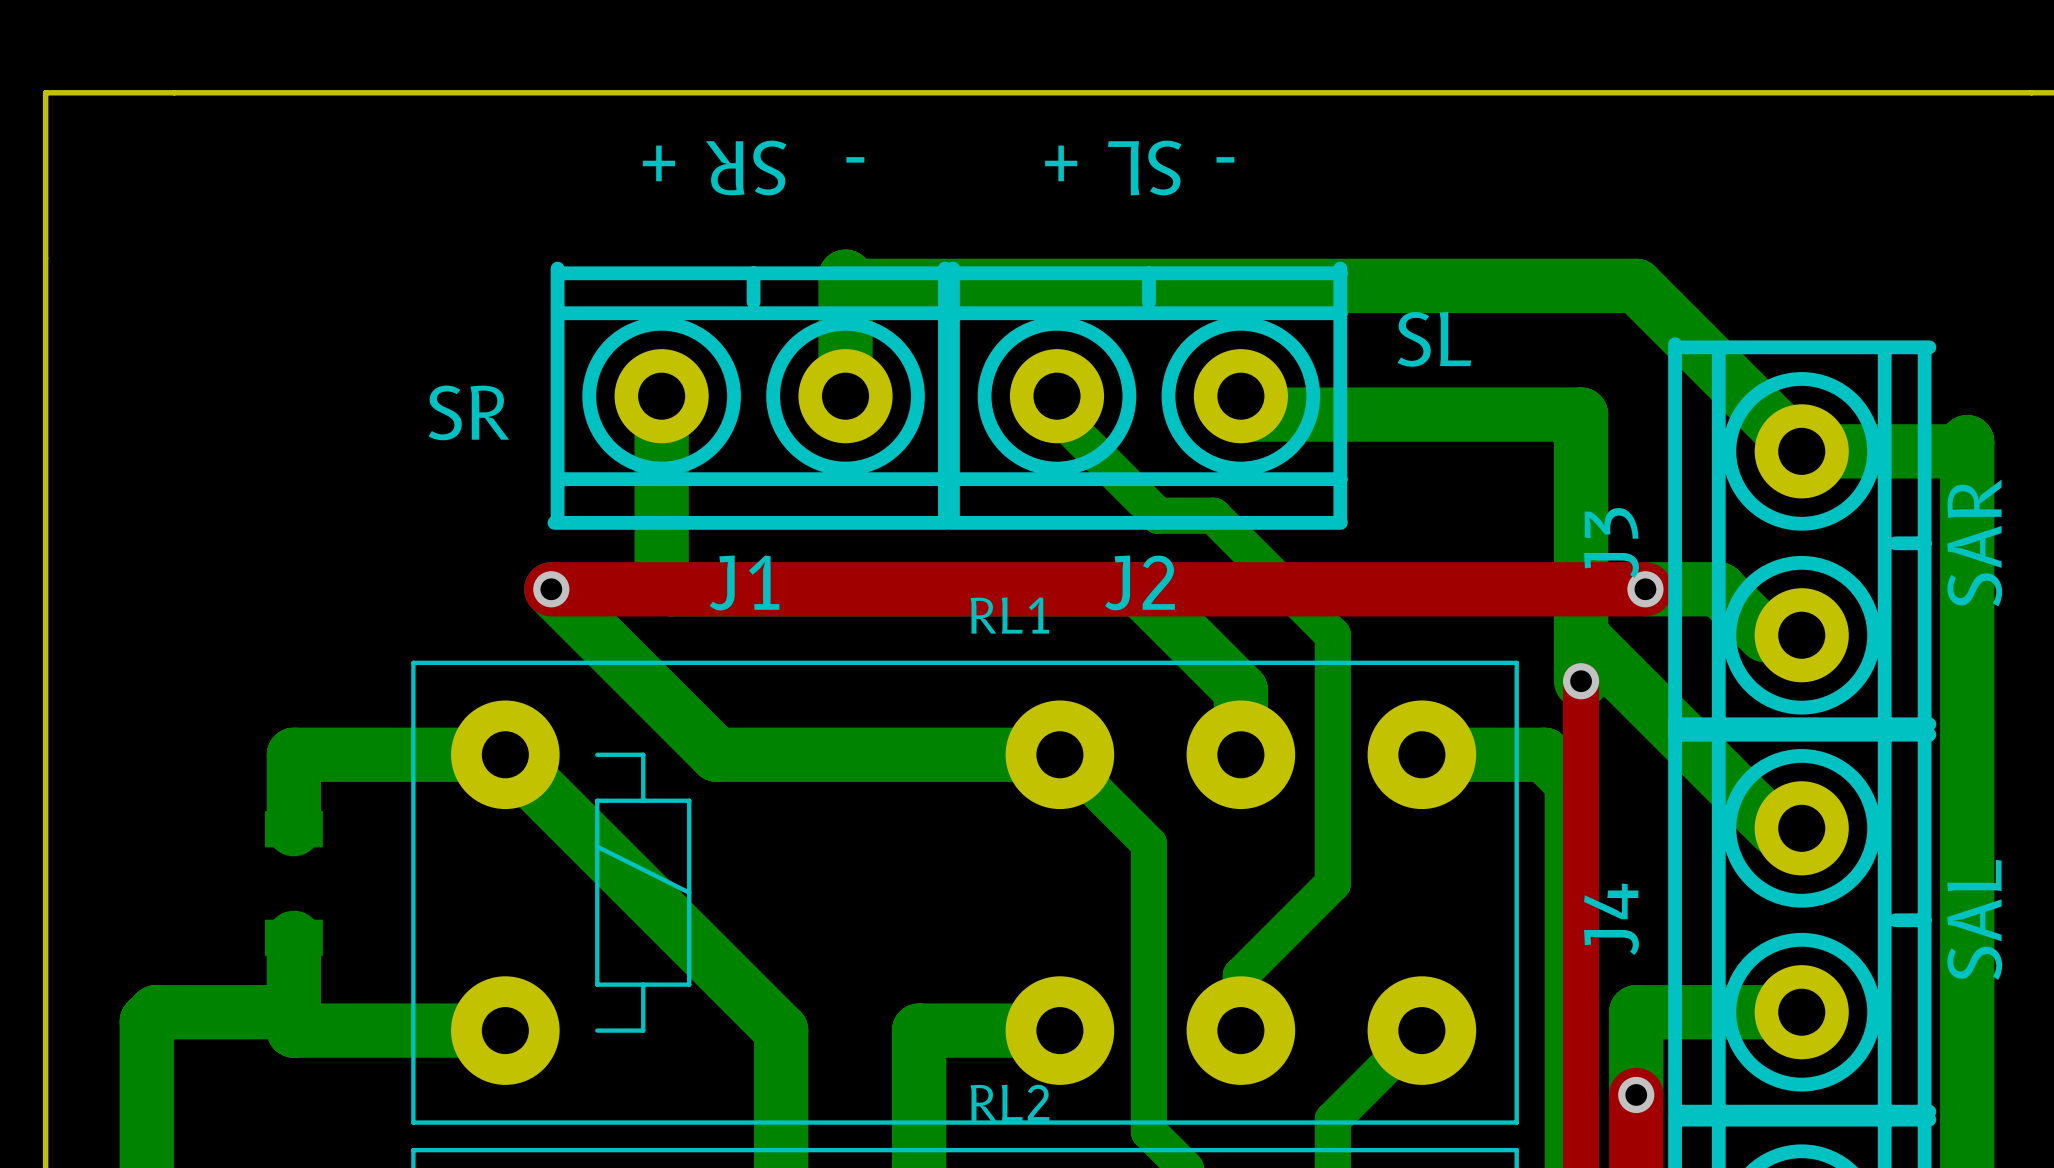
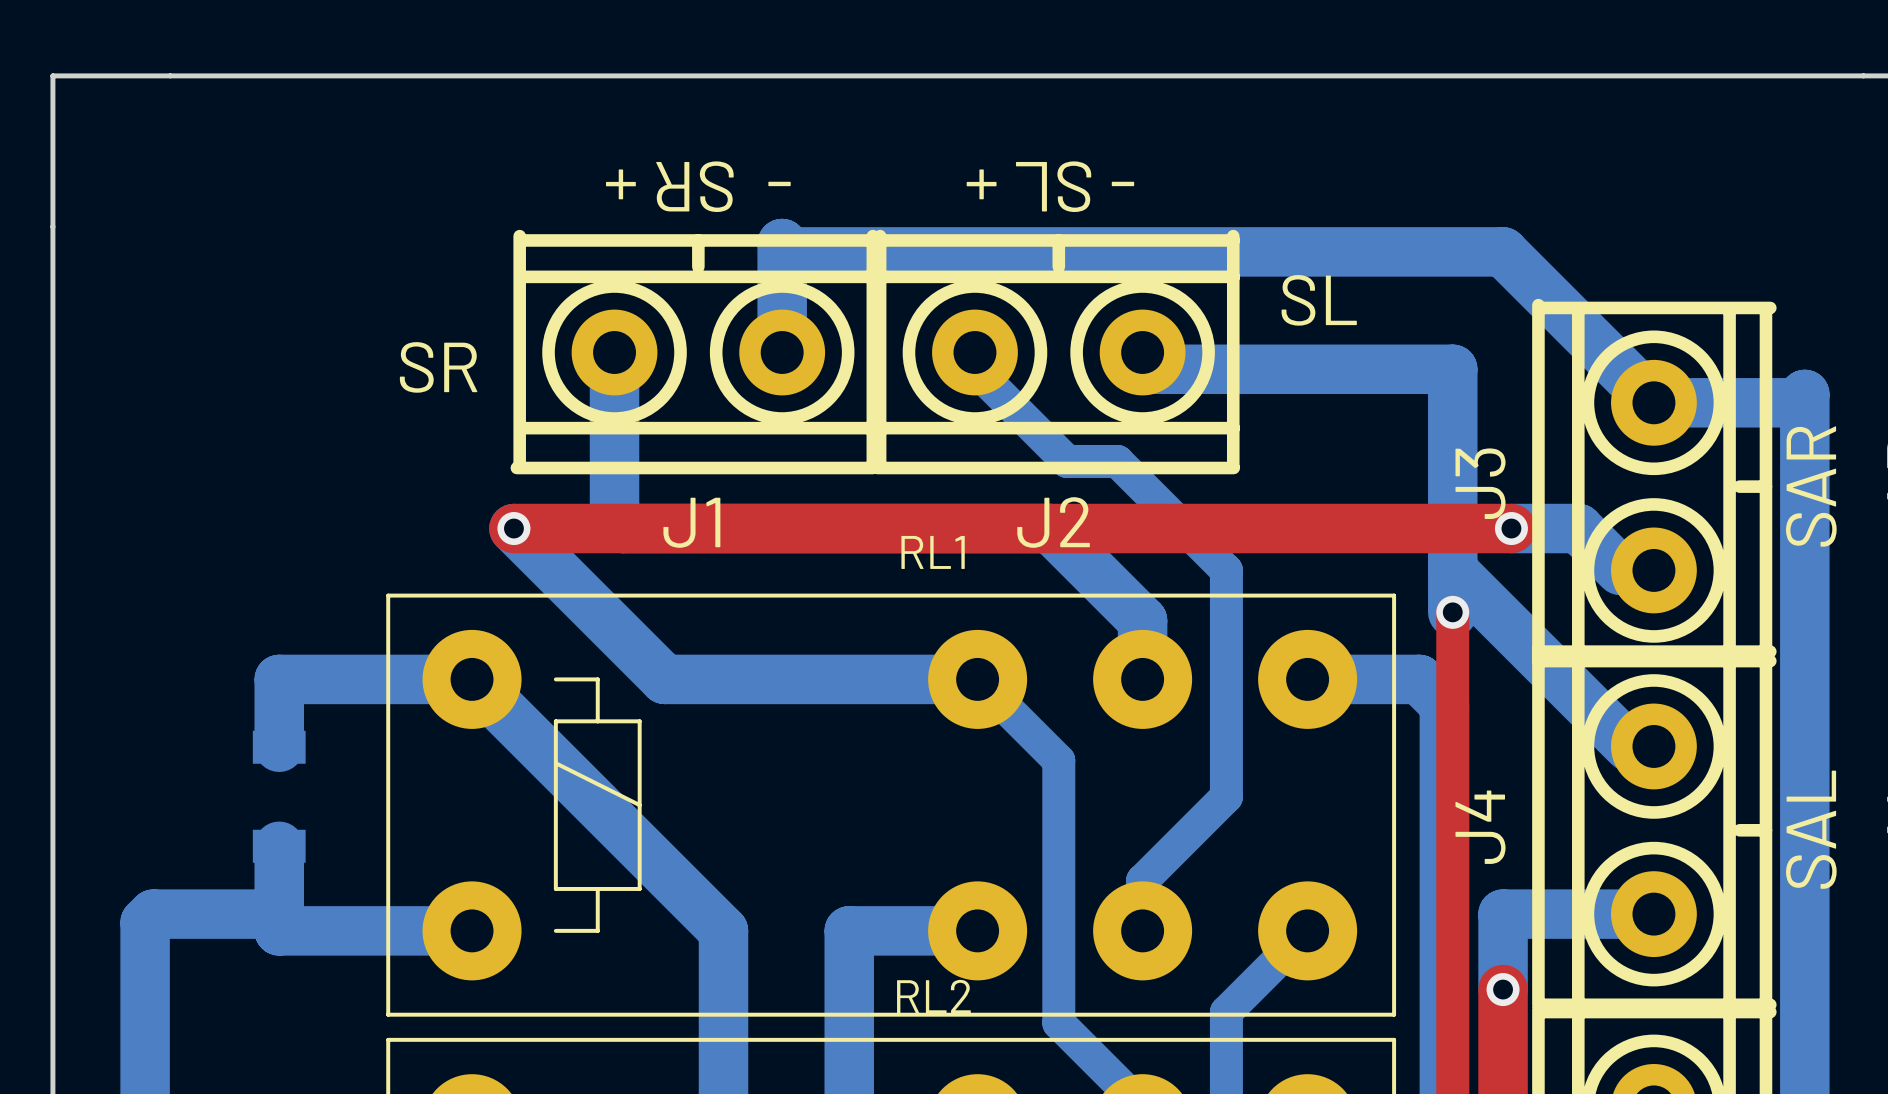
text position: - SR + (753, 168) -> - SR + (698, 186)
text position: - SL + (1139, 168) -> - SL + (1050, 186)

